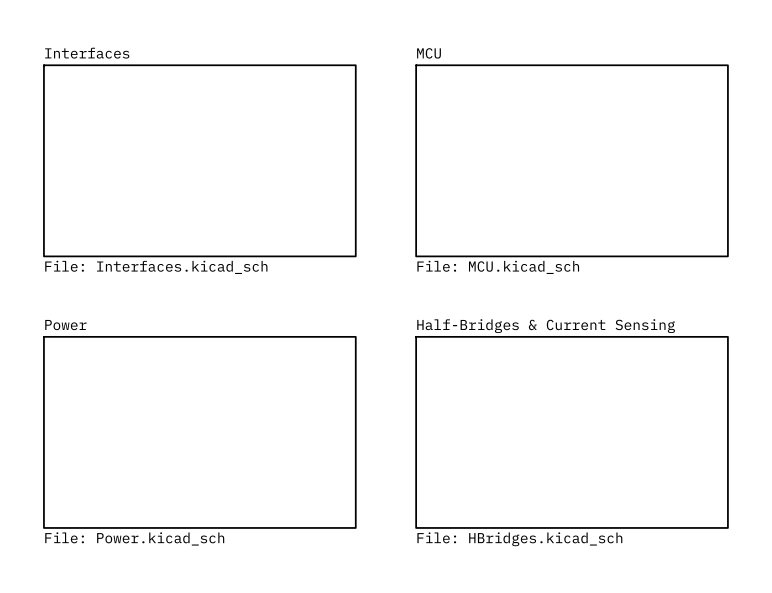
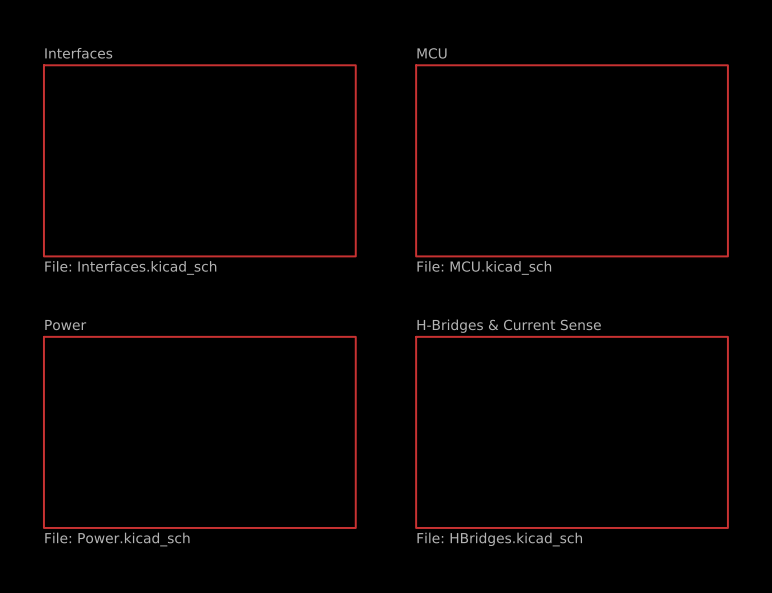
sheet Half-Bridges & Current Sensing name: Half-Bridges & Current Sensing (546, 326) -> H-Bridges & Current Sense (509, 326)

